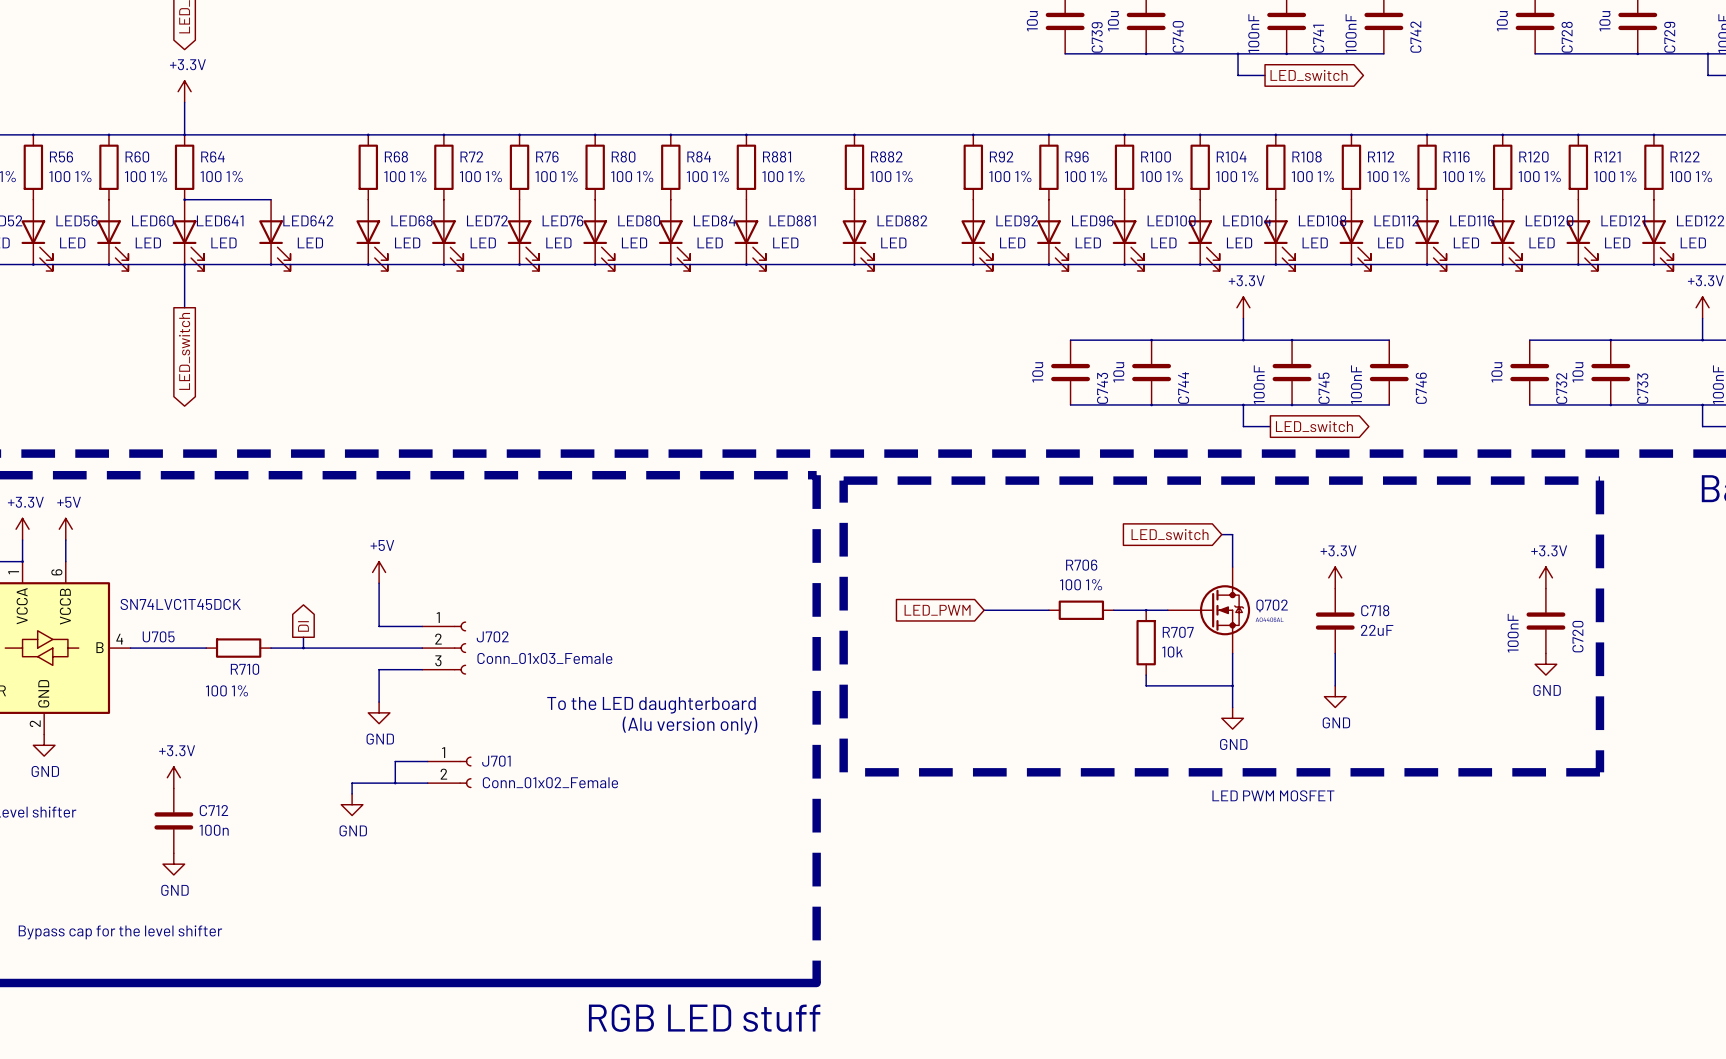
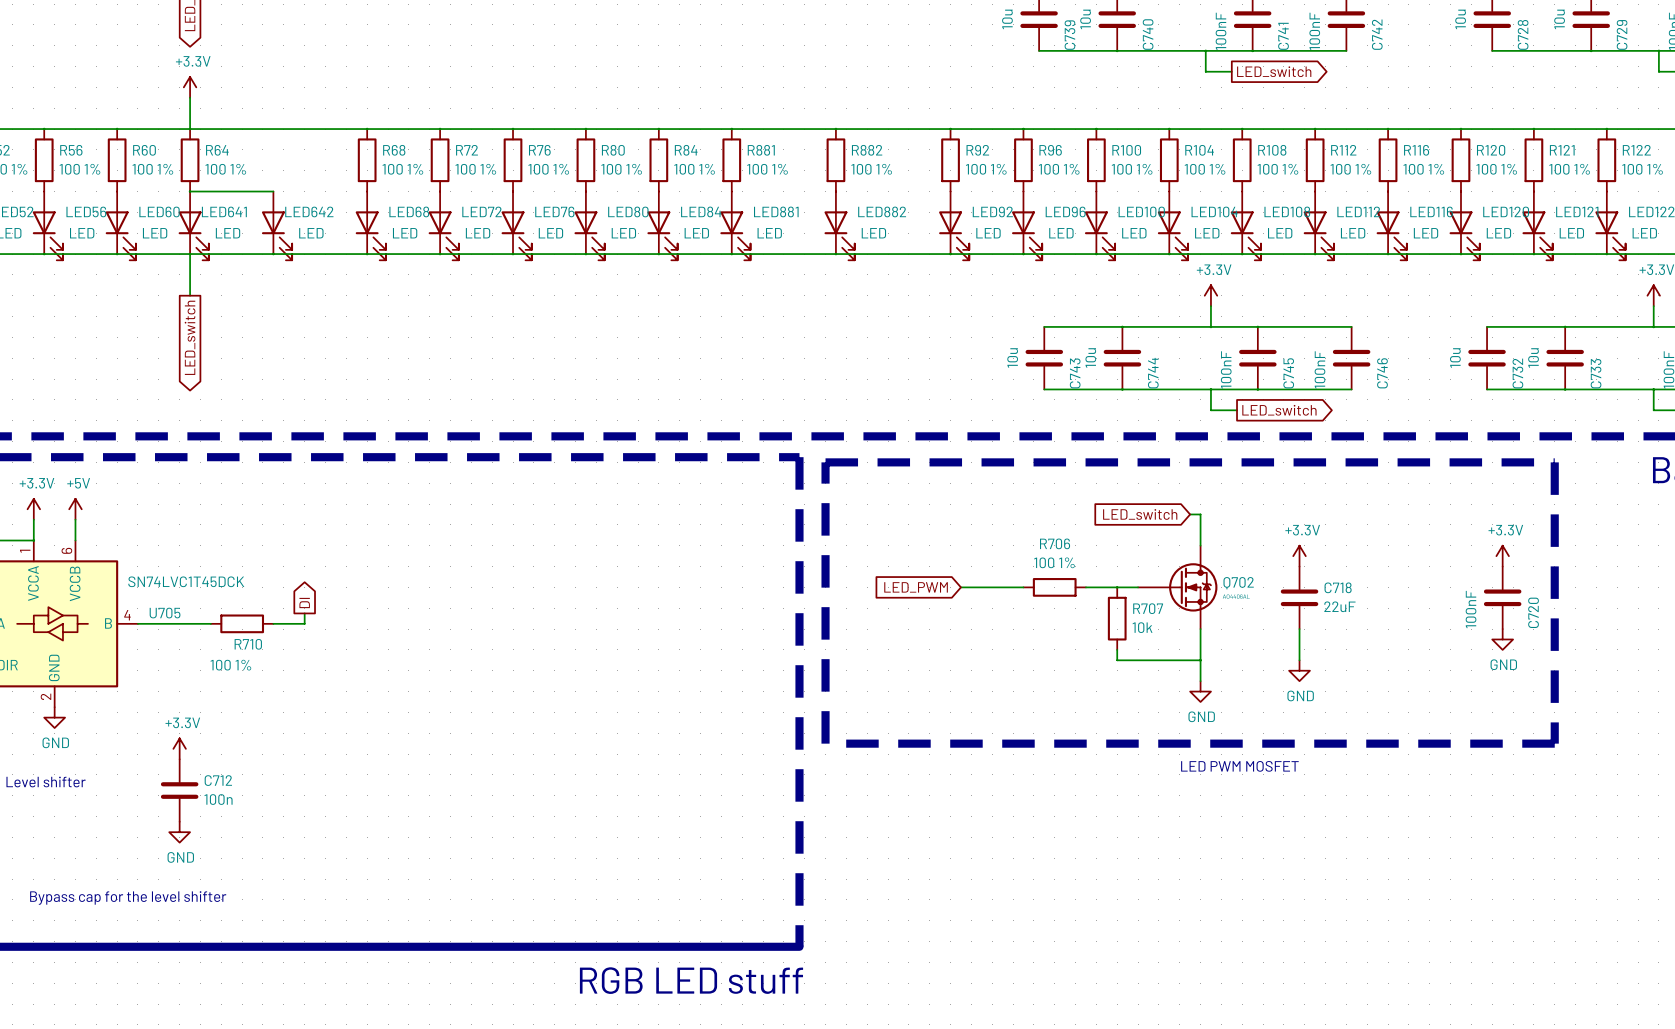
power symbol: +5V (379, 572) -> none
wire: (379, 583) (379, 626) (422, 626) -> none
wire: (303, 648) (422, 648) -> none
J702: Conn_01x03_Female (444, 648) -> none
wire: (422, 669) (379, 669) (379, 702) -> none
text: To the LED daughterboard (651, 705) -> none
power symbol: GND (379, 712) -> none
text: (Alu version only) (689, 725) -> none
wire: (427, 761) (395, 761) (395, 783) -> none
J701: Conn_01x02_Female (449, 772) -> none
wire: (427, 783) (352, 783) (352, 793) -> none
power symbol: GND (352, 804) -> none

